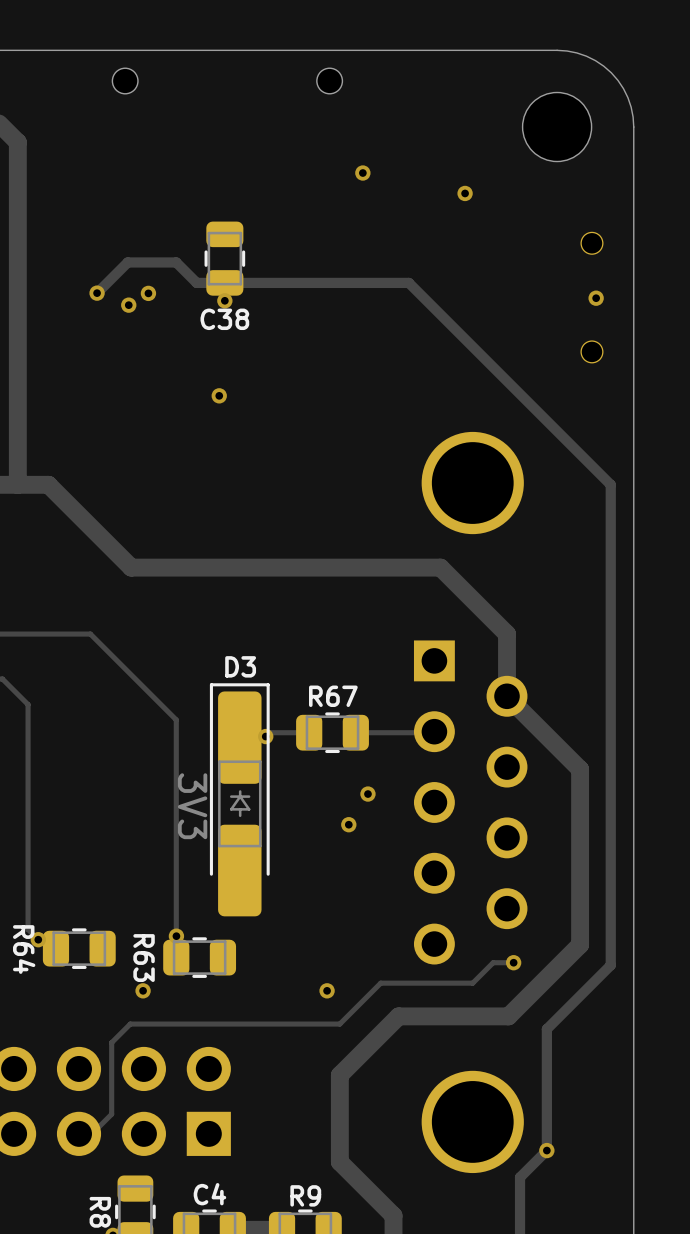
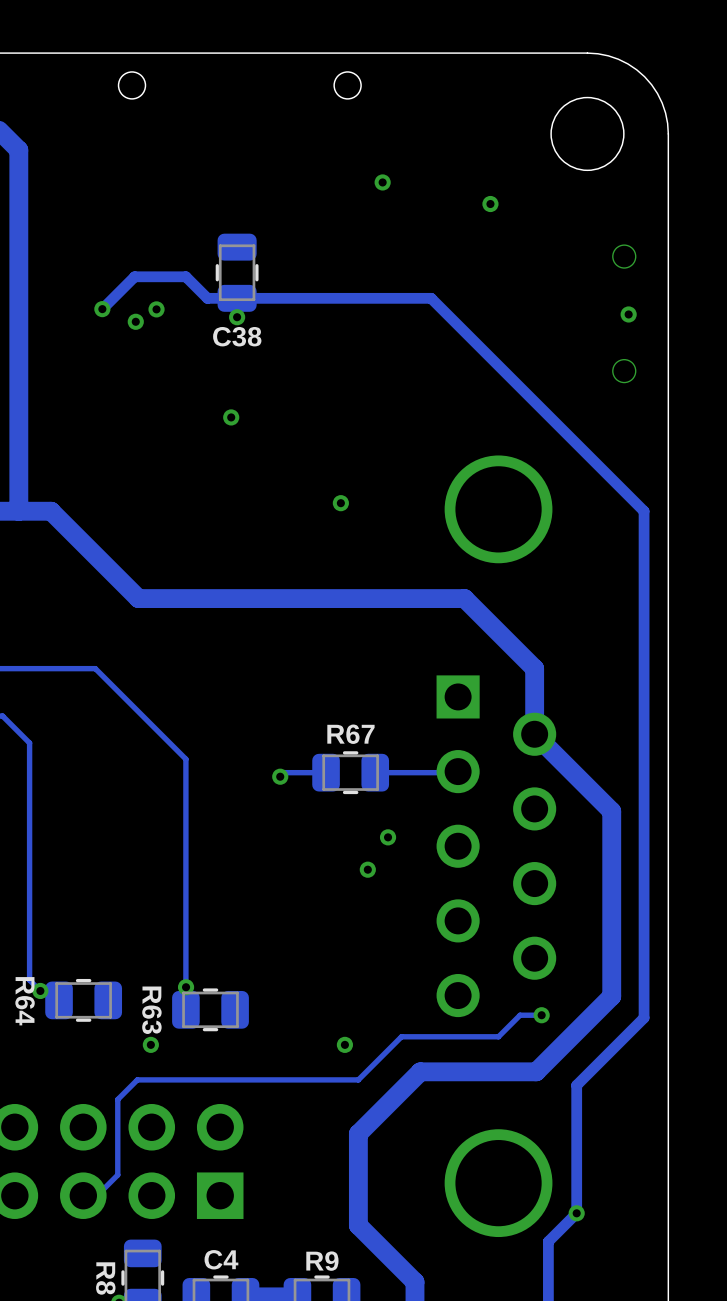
via: none -> (340, 503)
D3: 3V3 (239, 799) -> none

